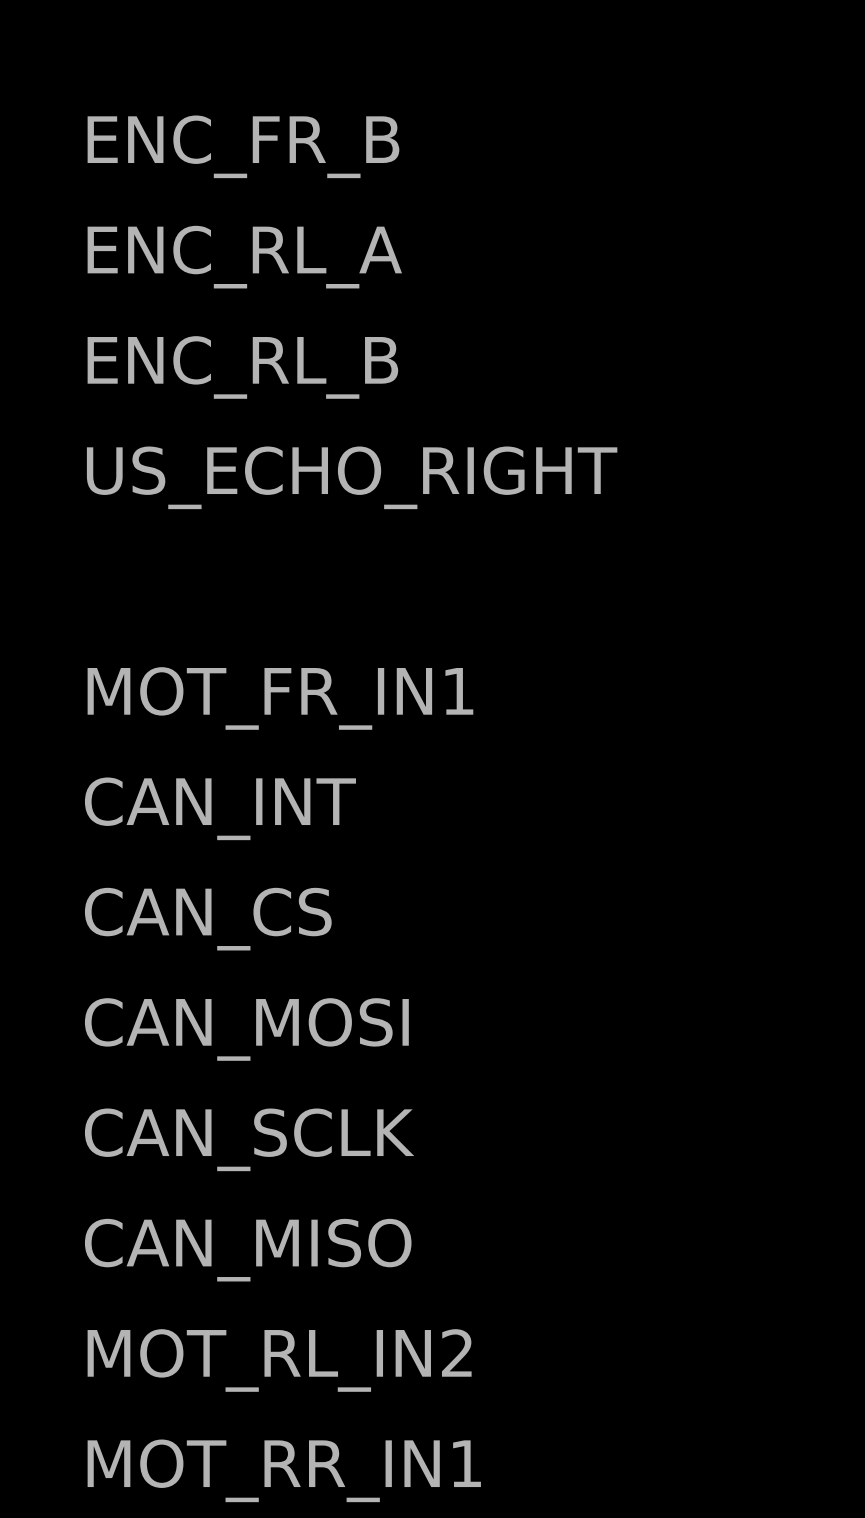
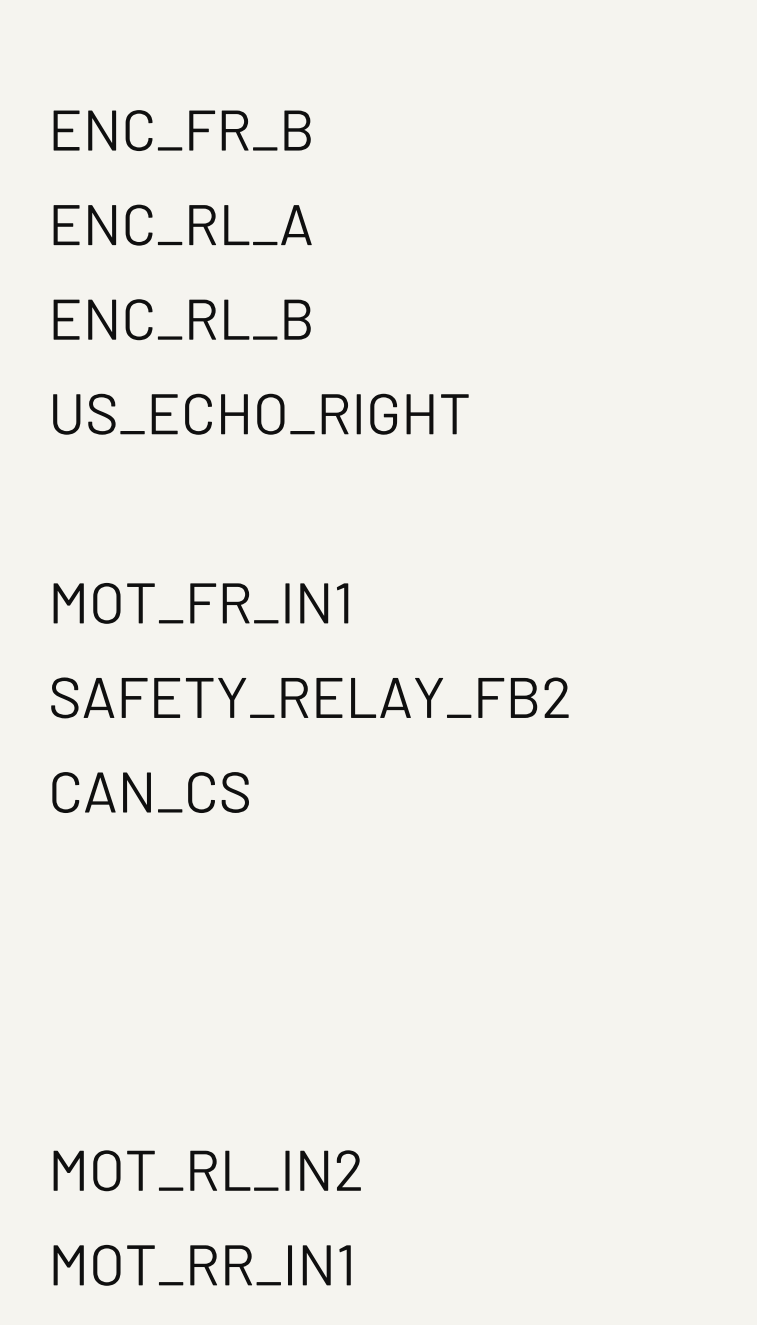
label: CAN_INT (220, 808) -> SAFETY_RELAY_FB2 (309, 697)
label: CAN_MOSI (246, 1029) -> none
label: CAN_SCLK (249, 1139) -> none
label: CAN_MISO (248, 1250) -> none

